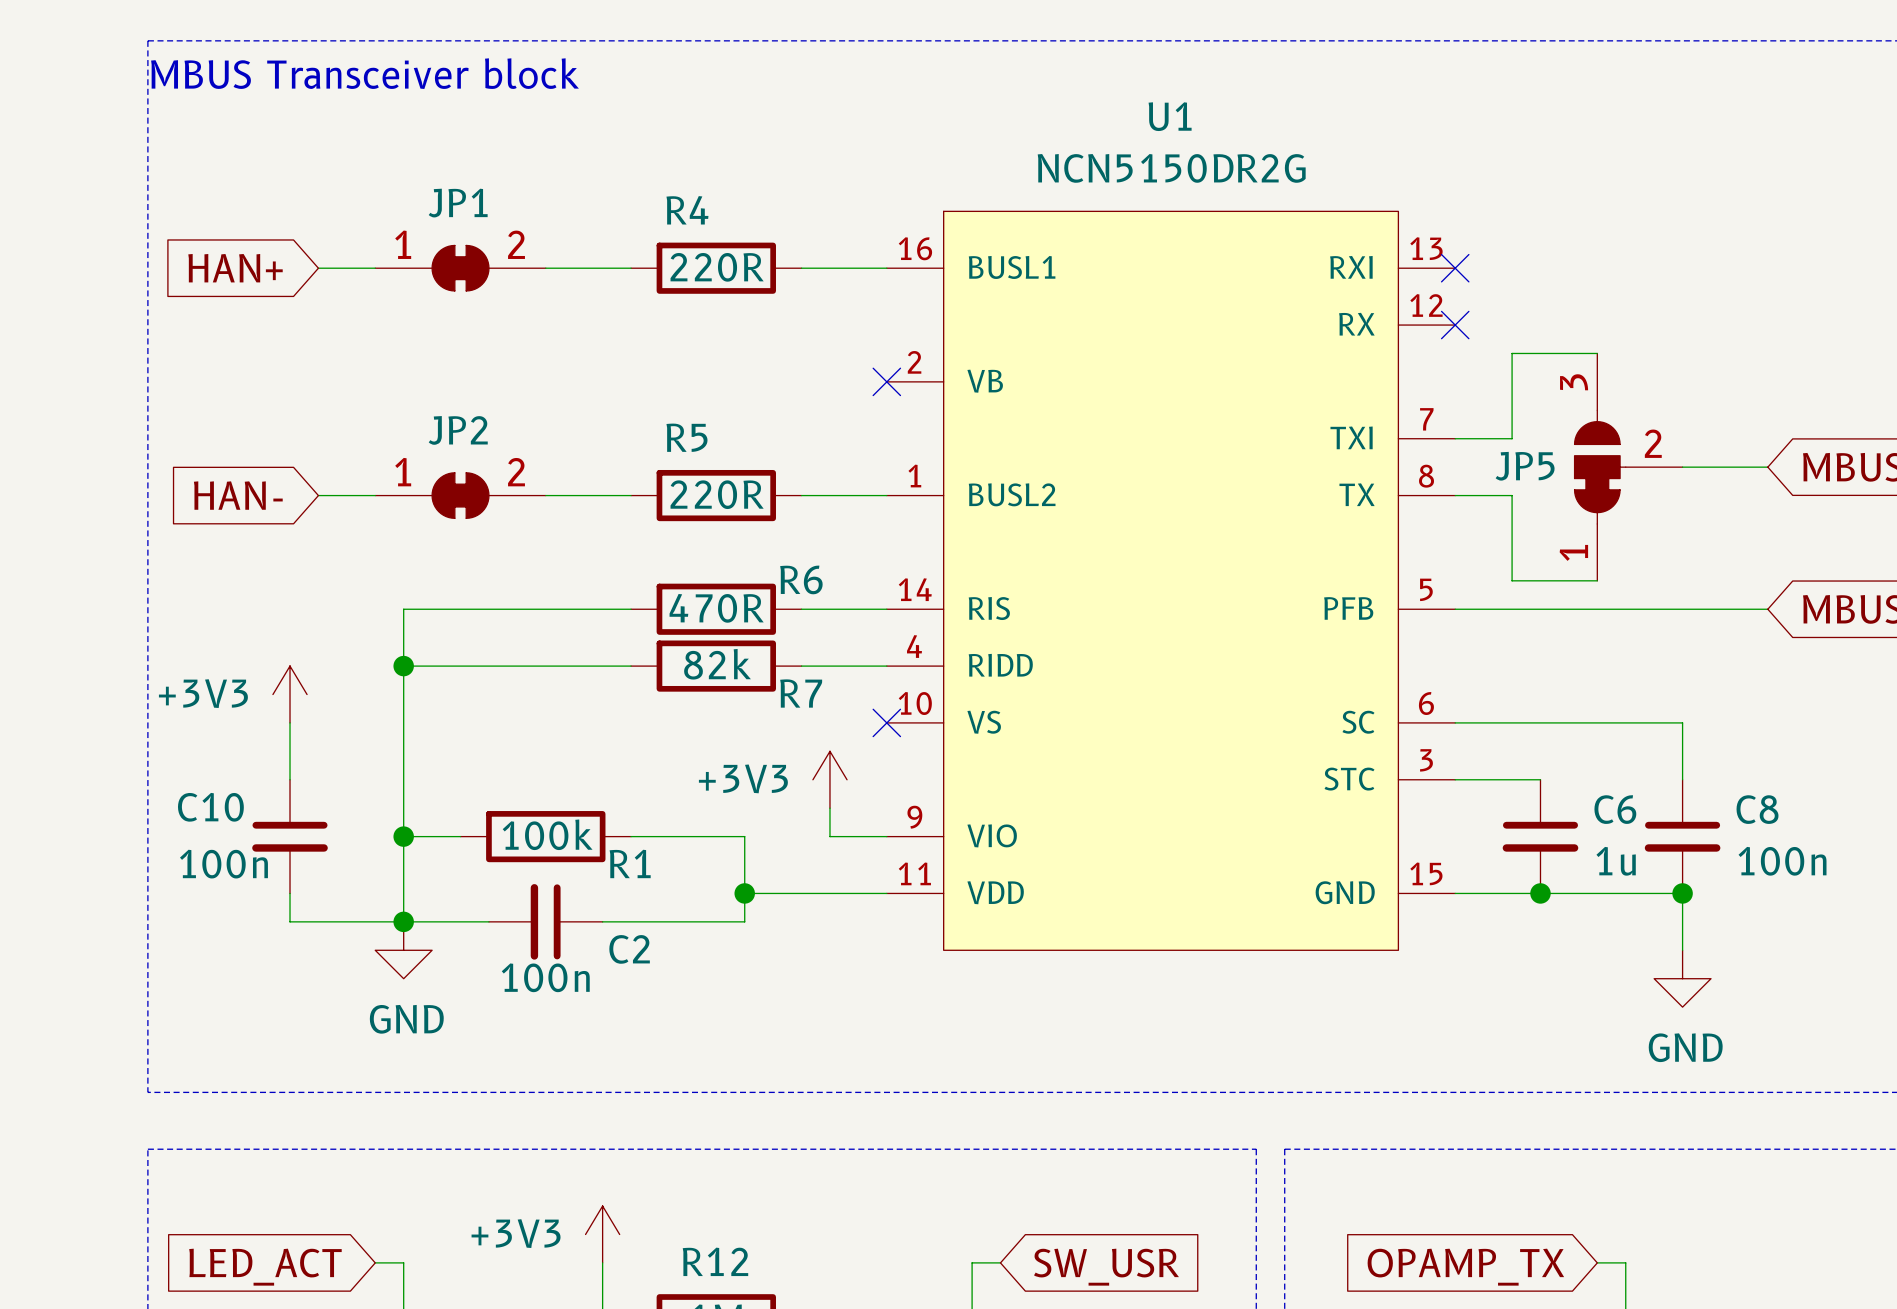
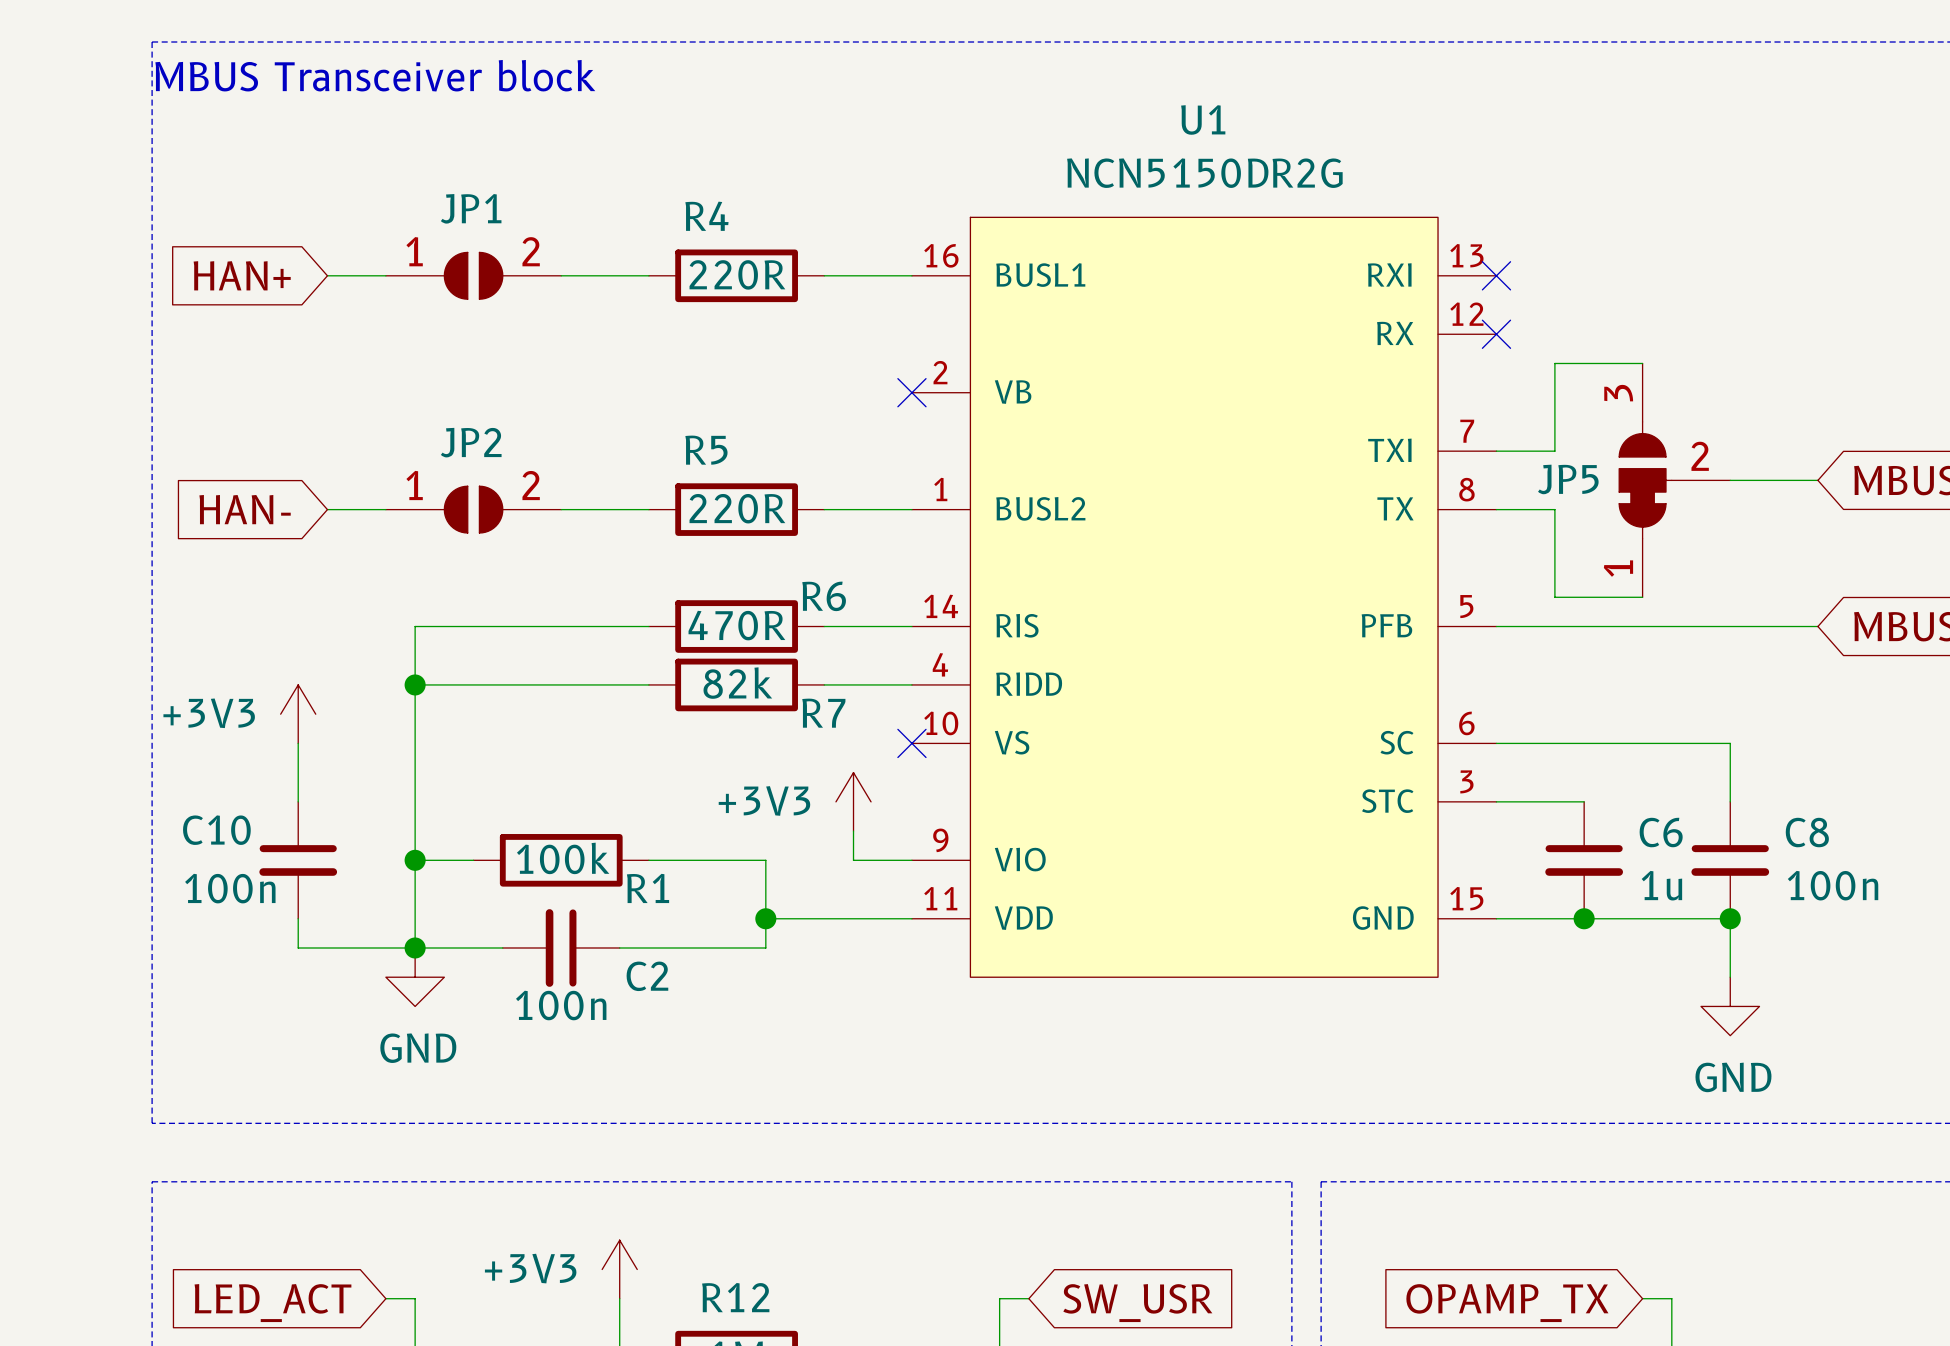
JP1 symbol: [375, 245, 546, 291] -> [385, 252, 562, 300]
JP2 symbol: [375, 472, 546, 519] -> [385, 486, 562, 533]

